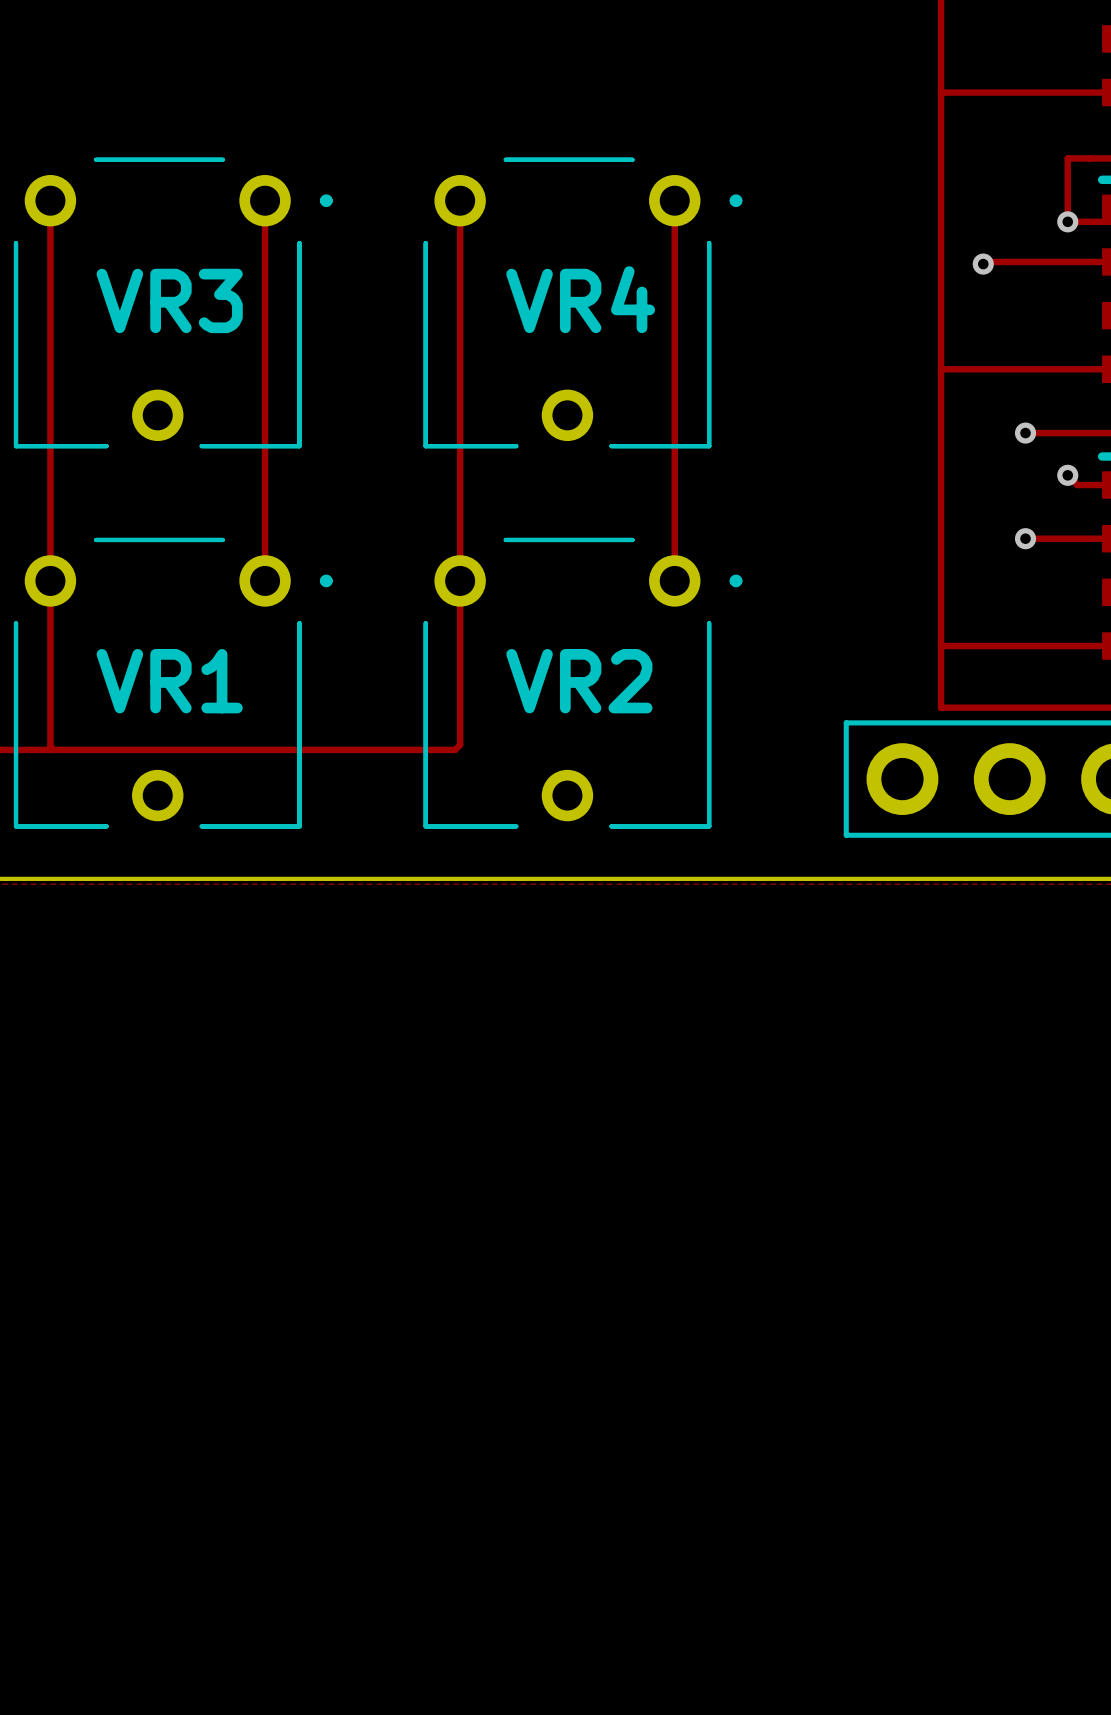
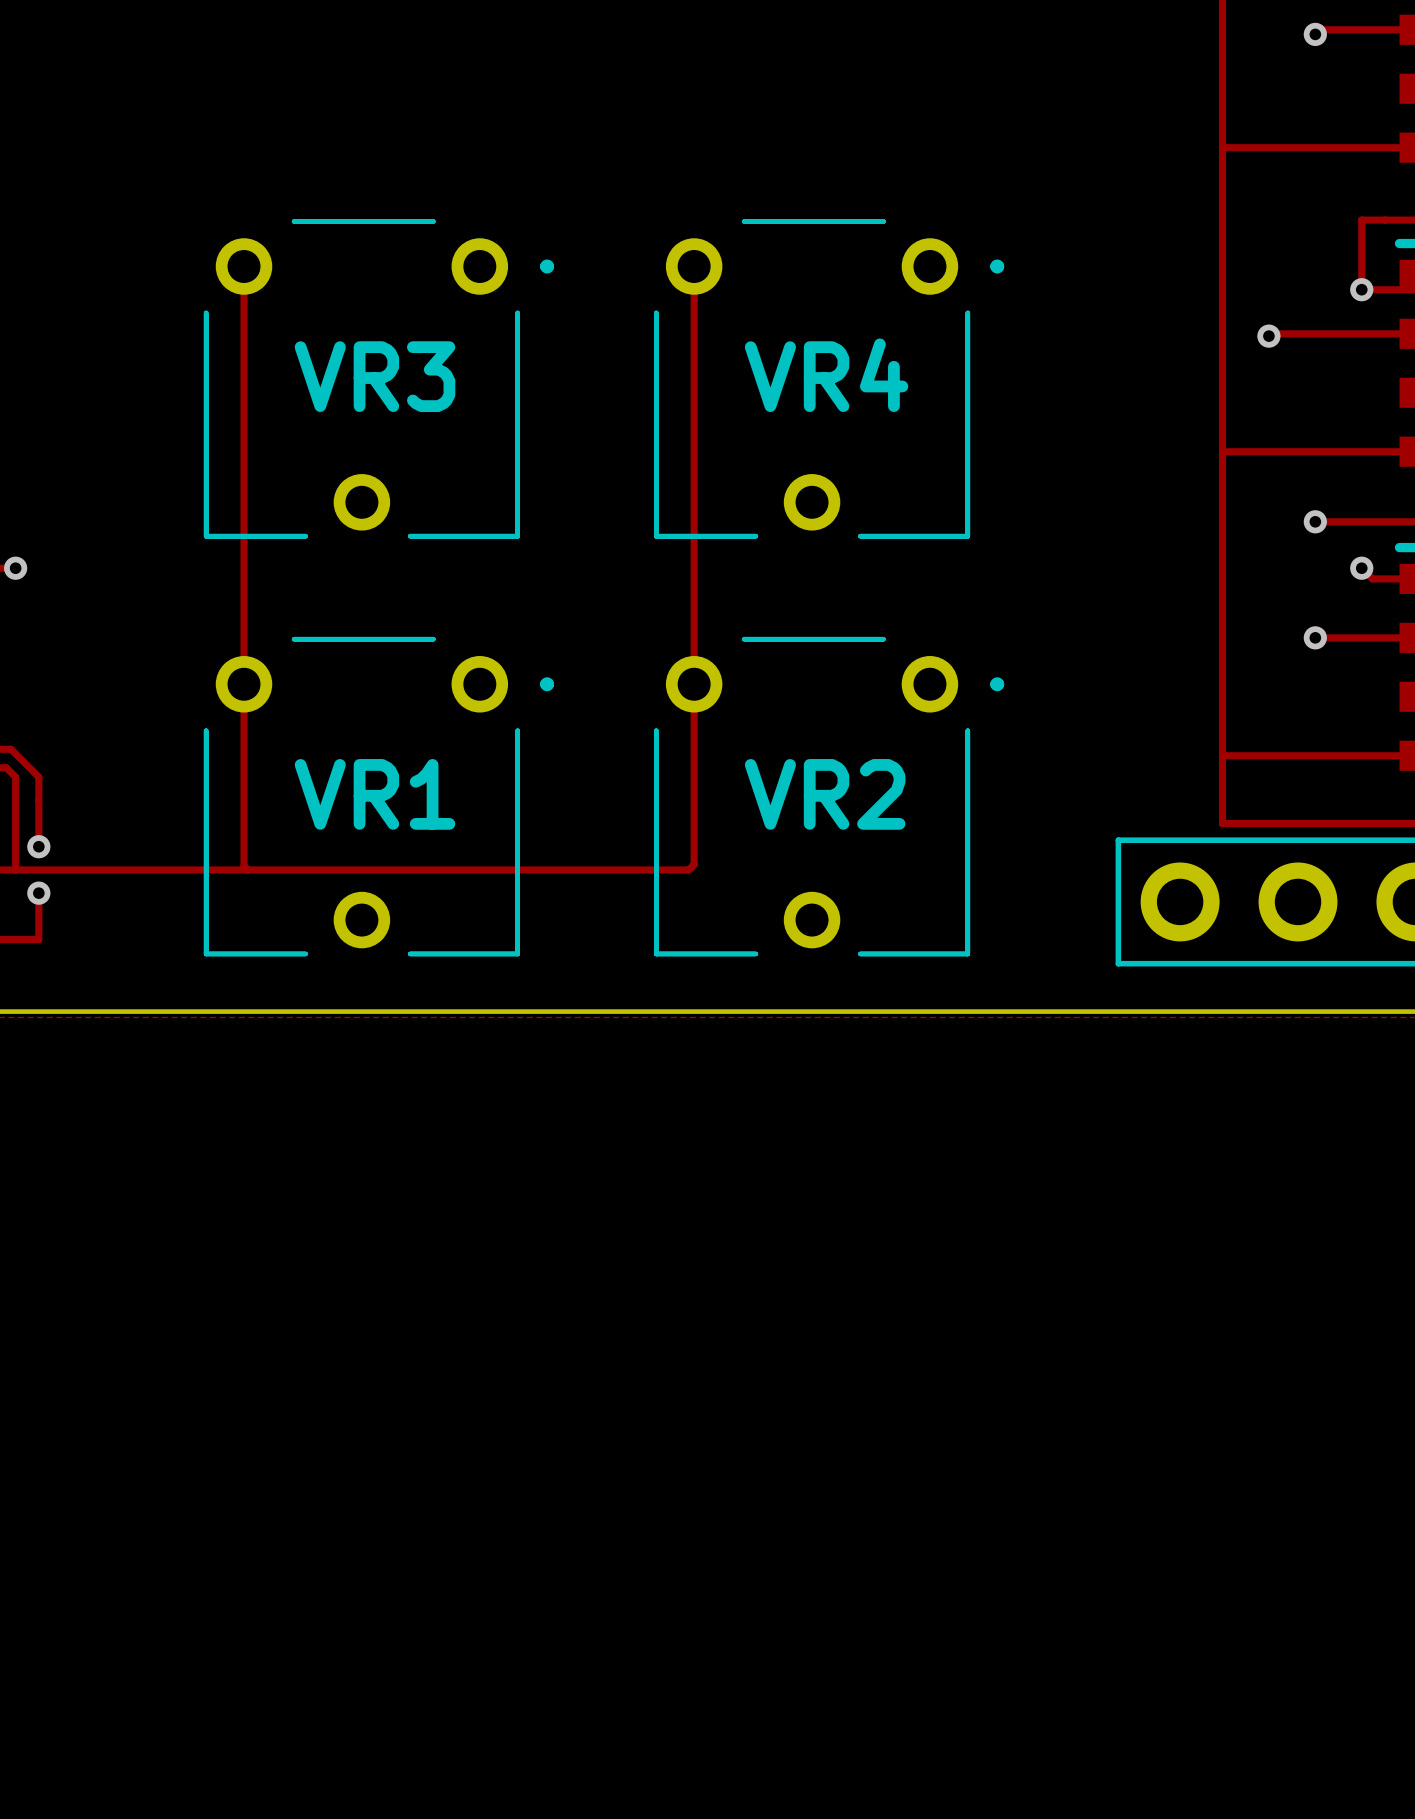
track: (265, 200) (265, 580) -> none
track: (674, 200) (674, 580) -> none

